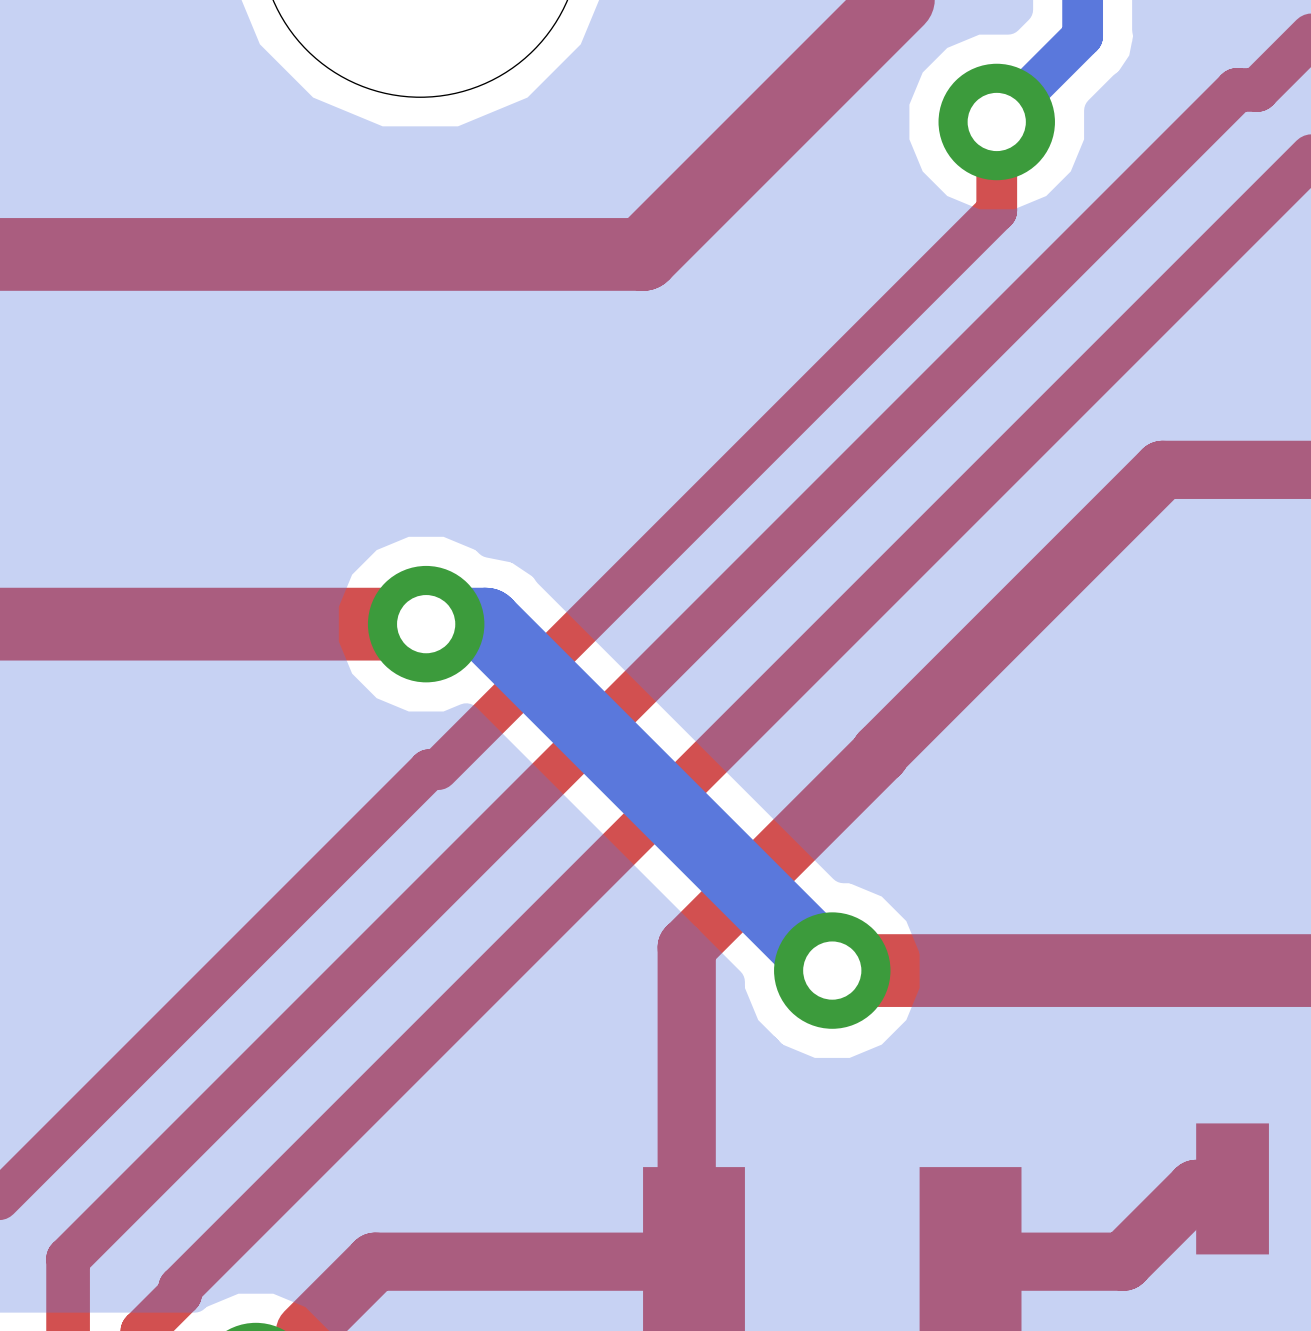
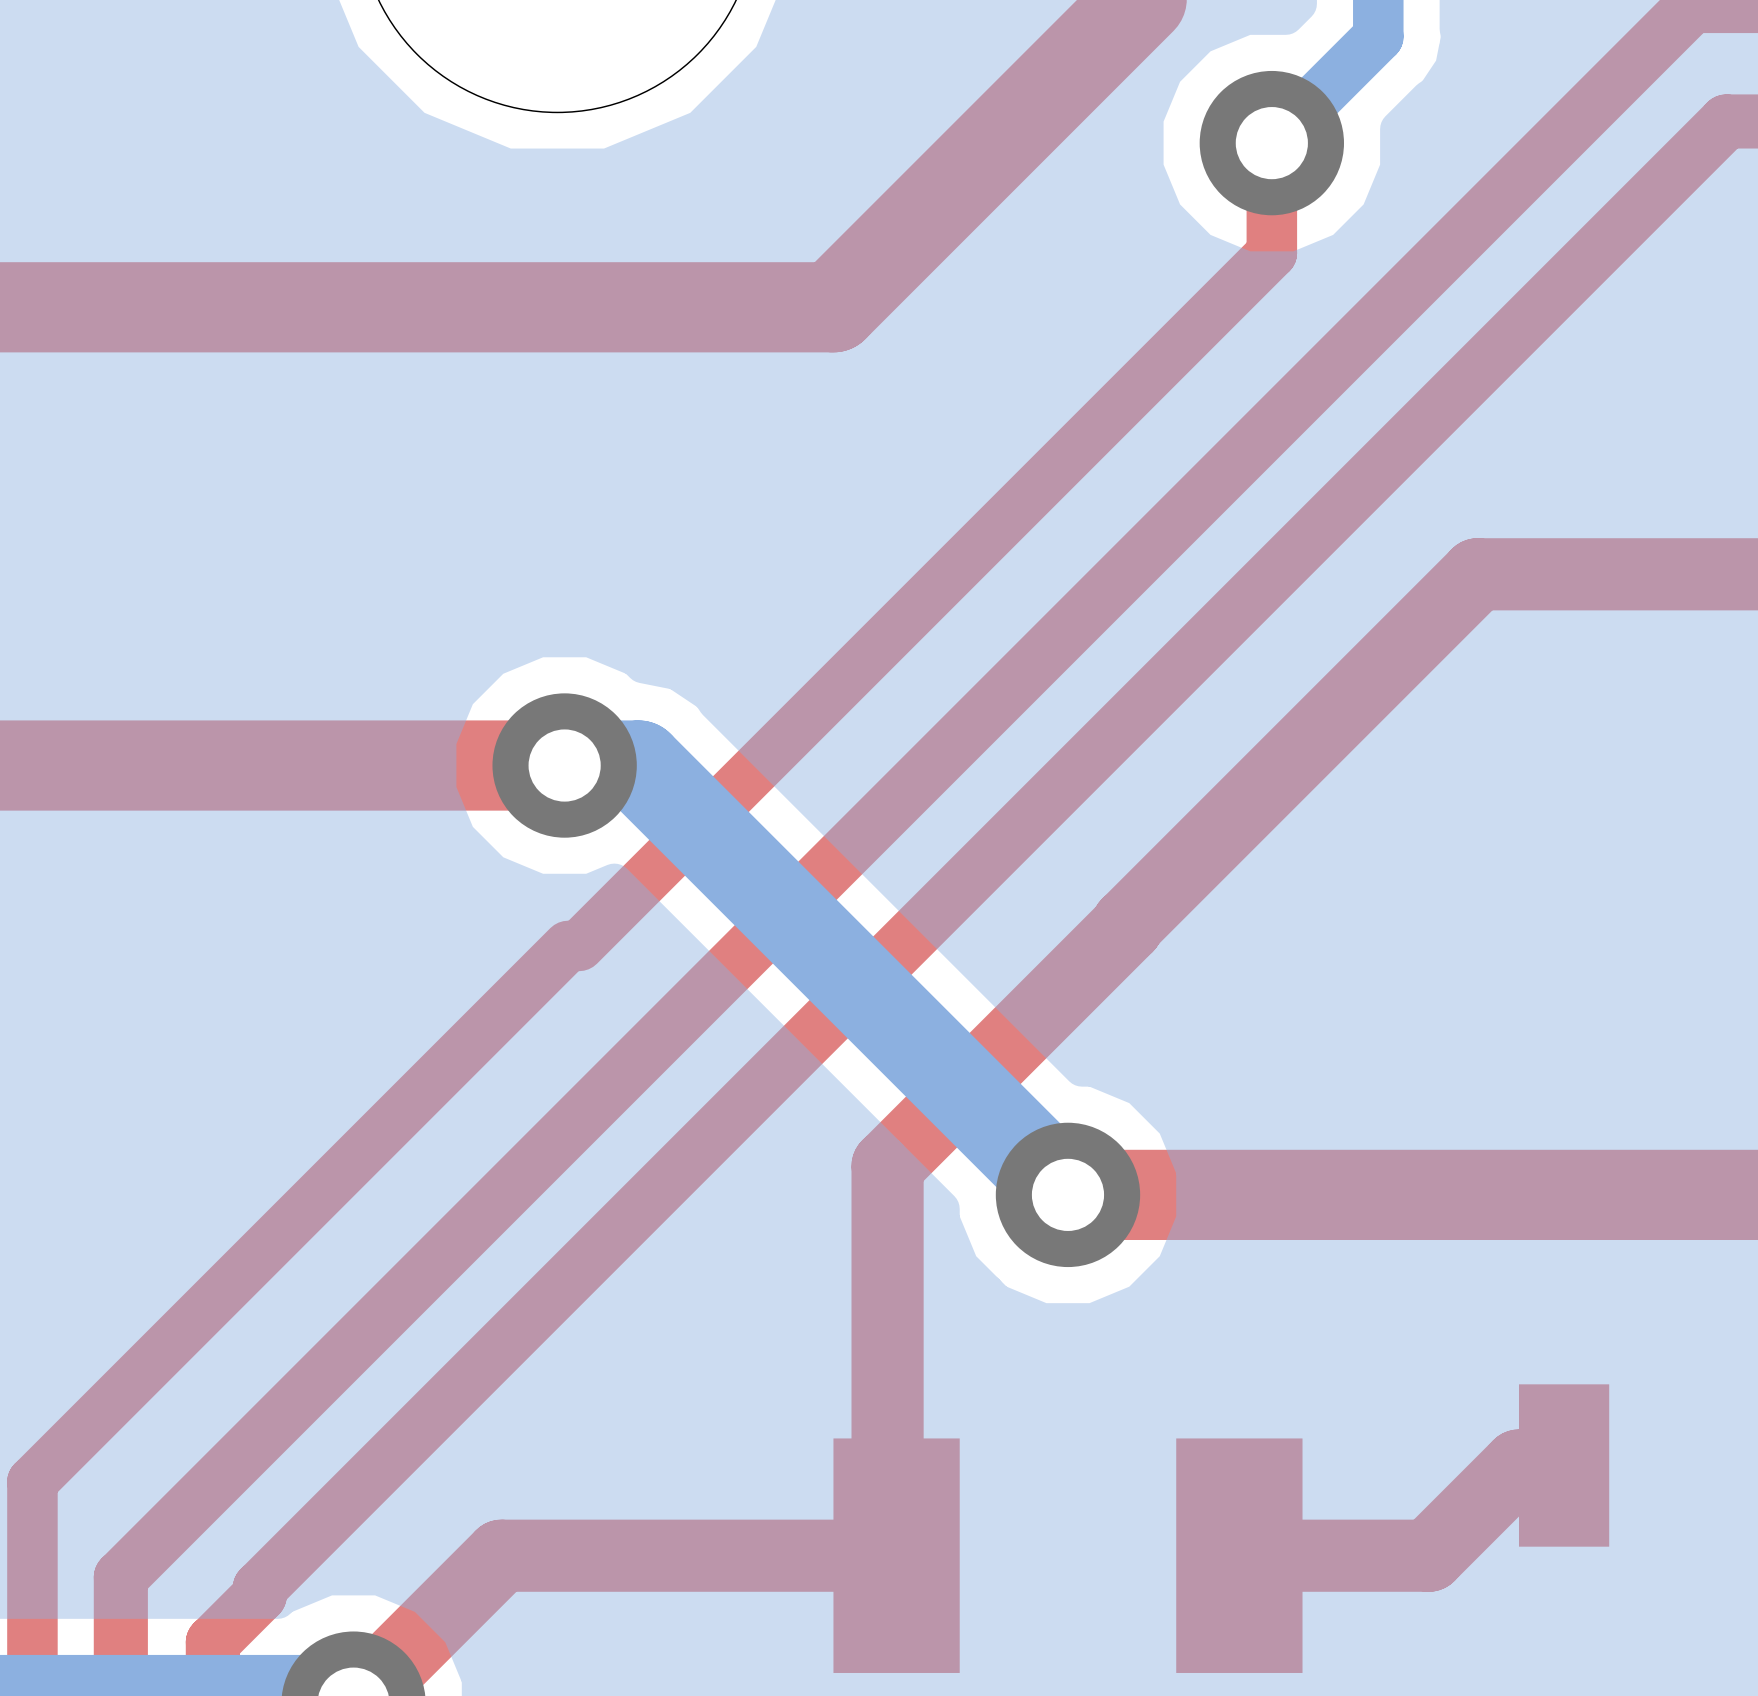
top track: (1257, 89) (1236, 89) (68, 1258) (68, 1279) -> (1594, 103) (120, 1577)

